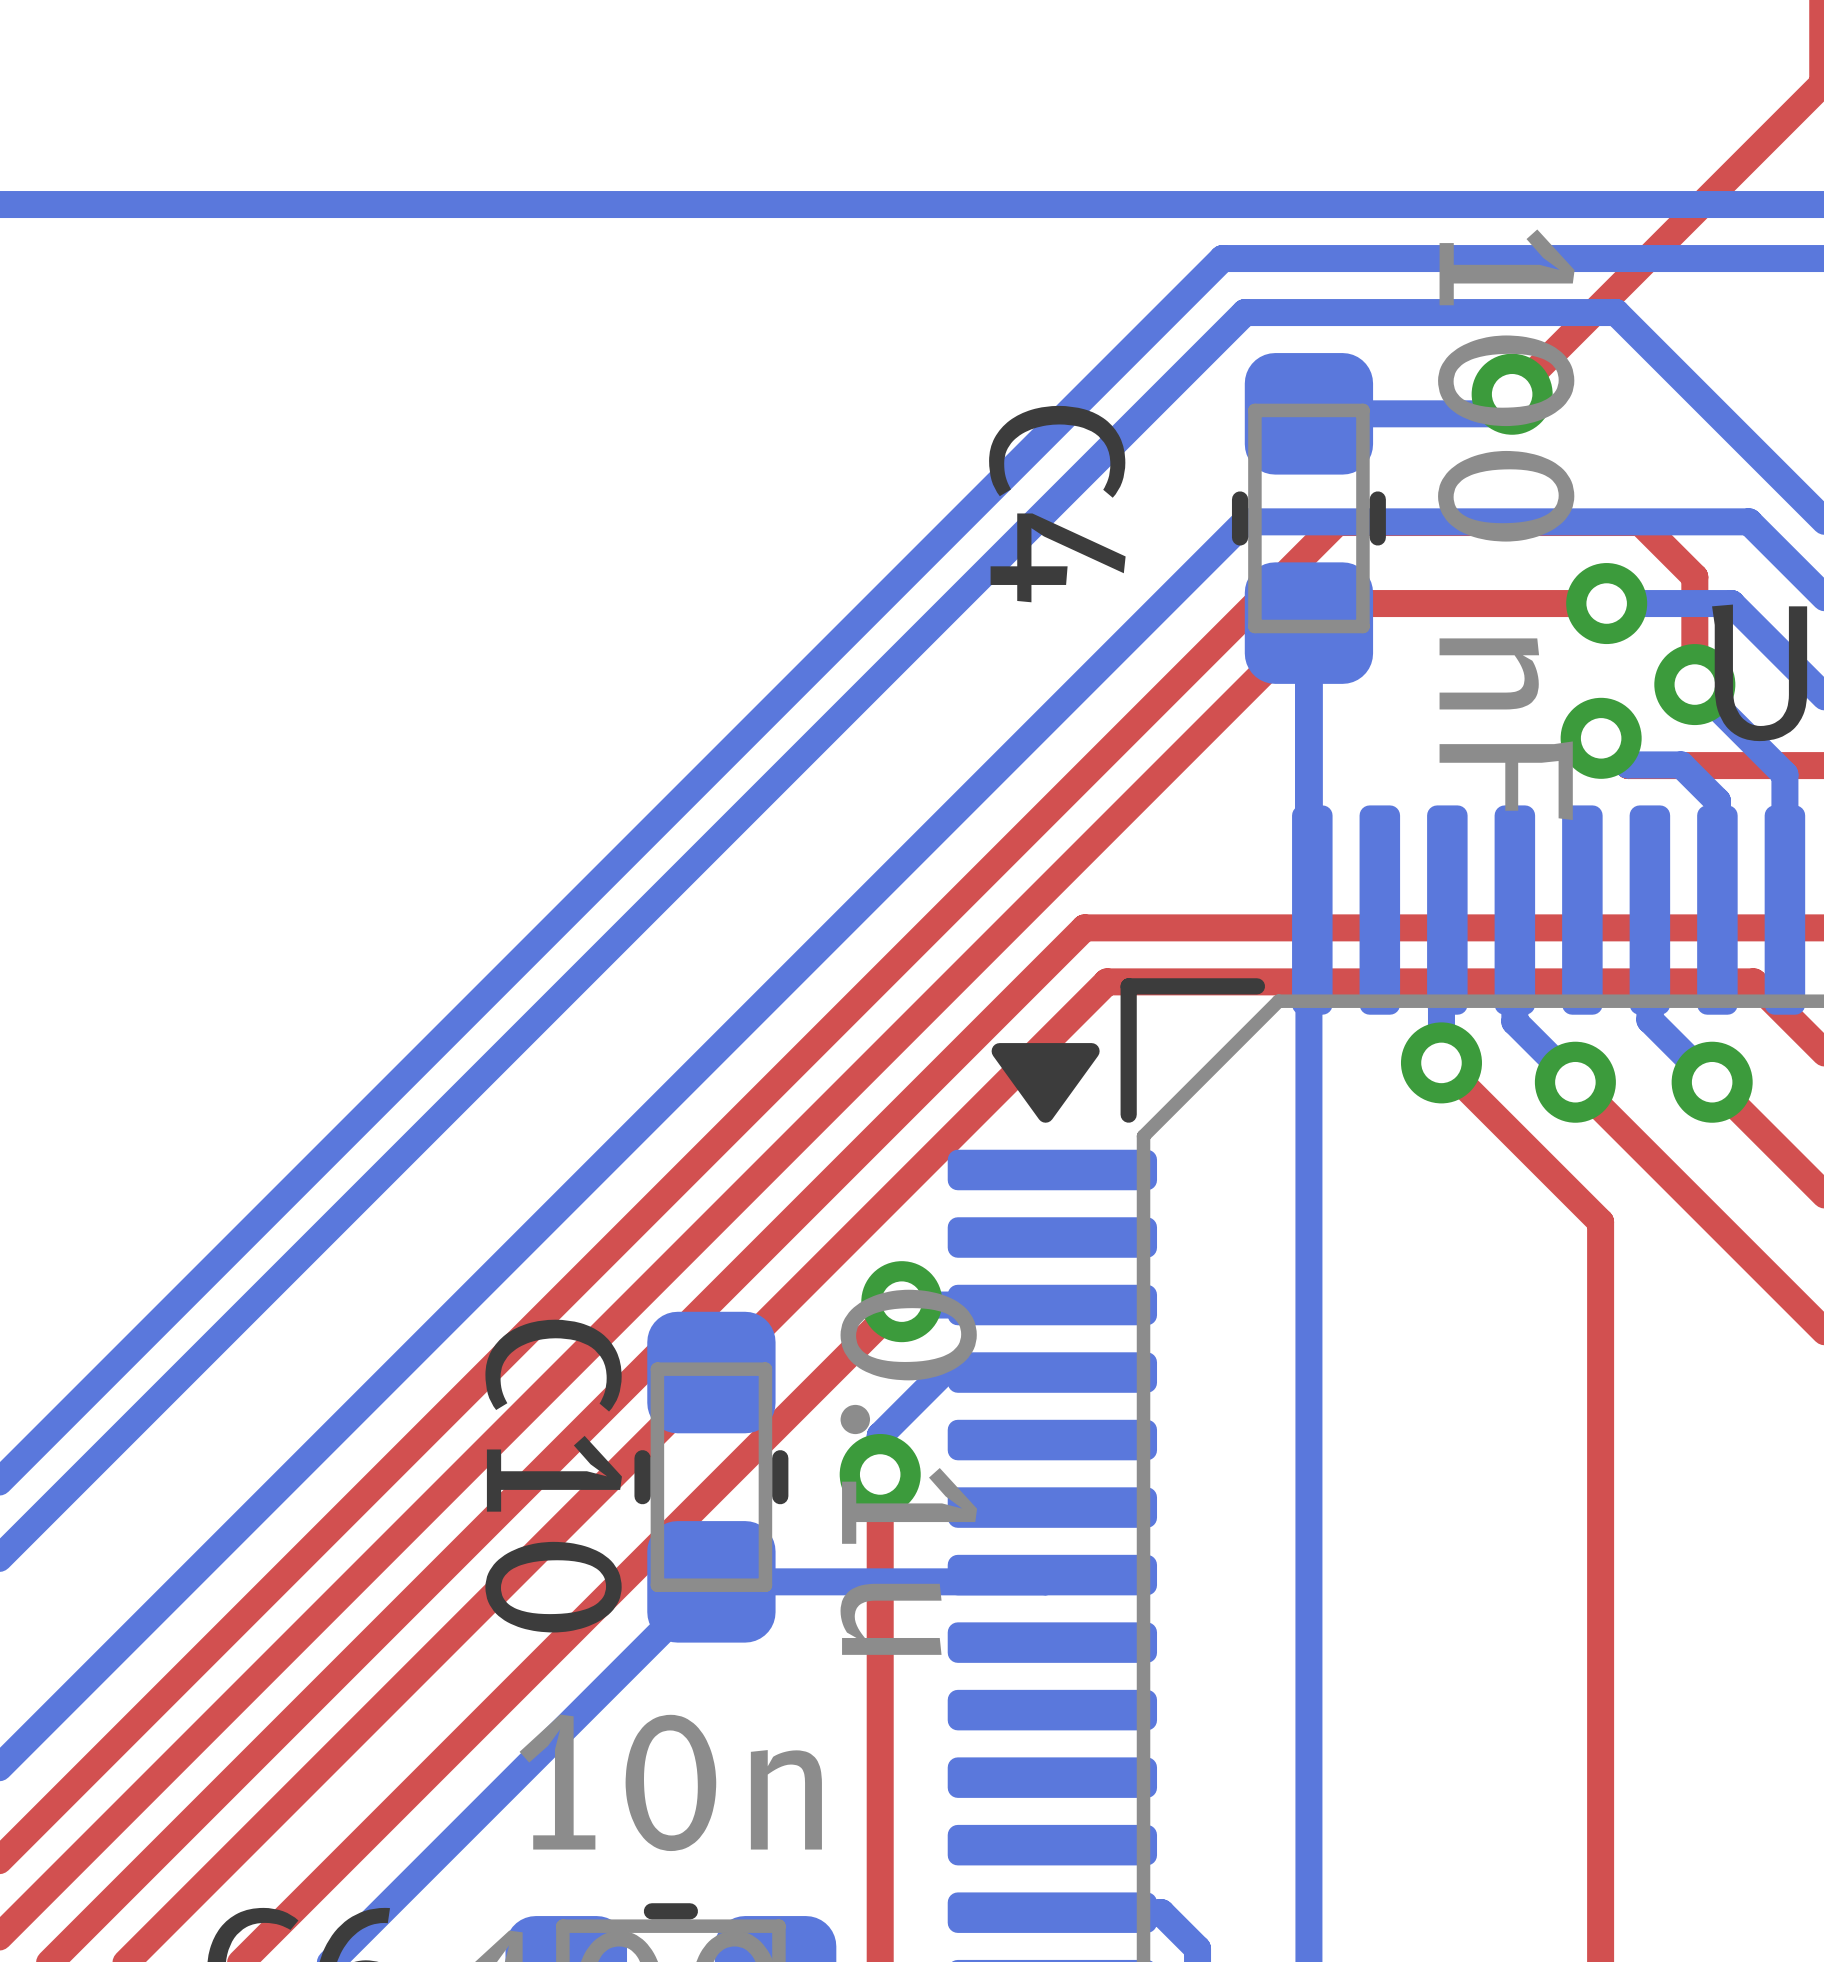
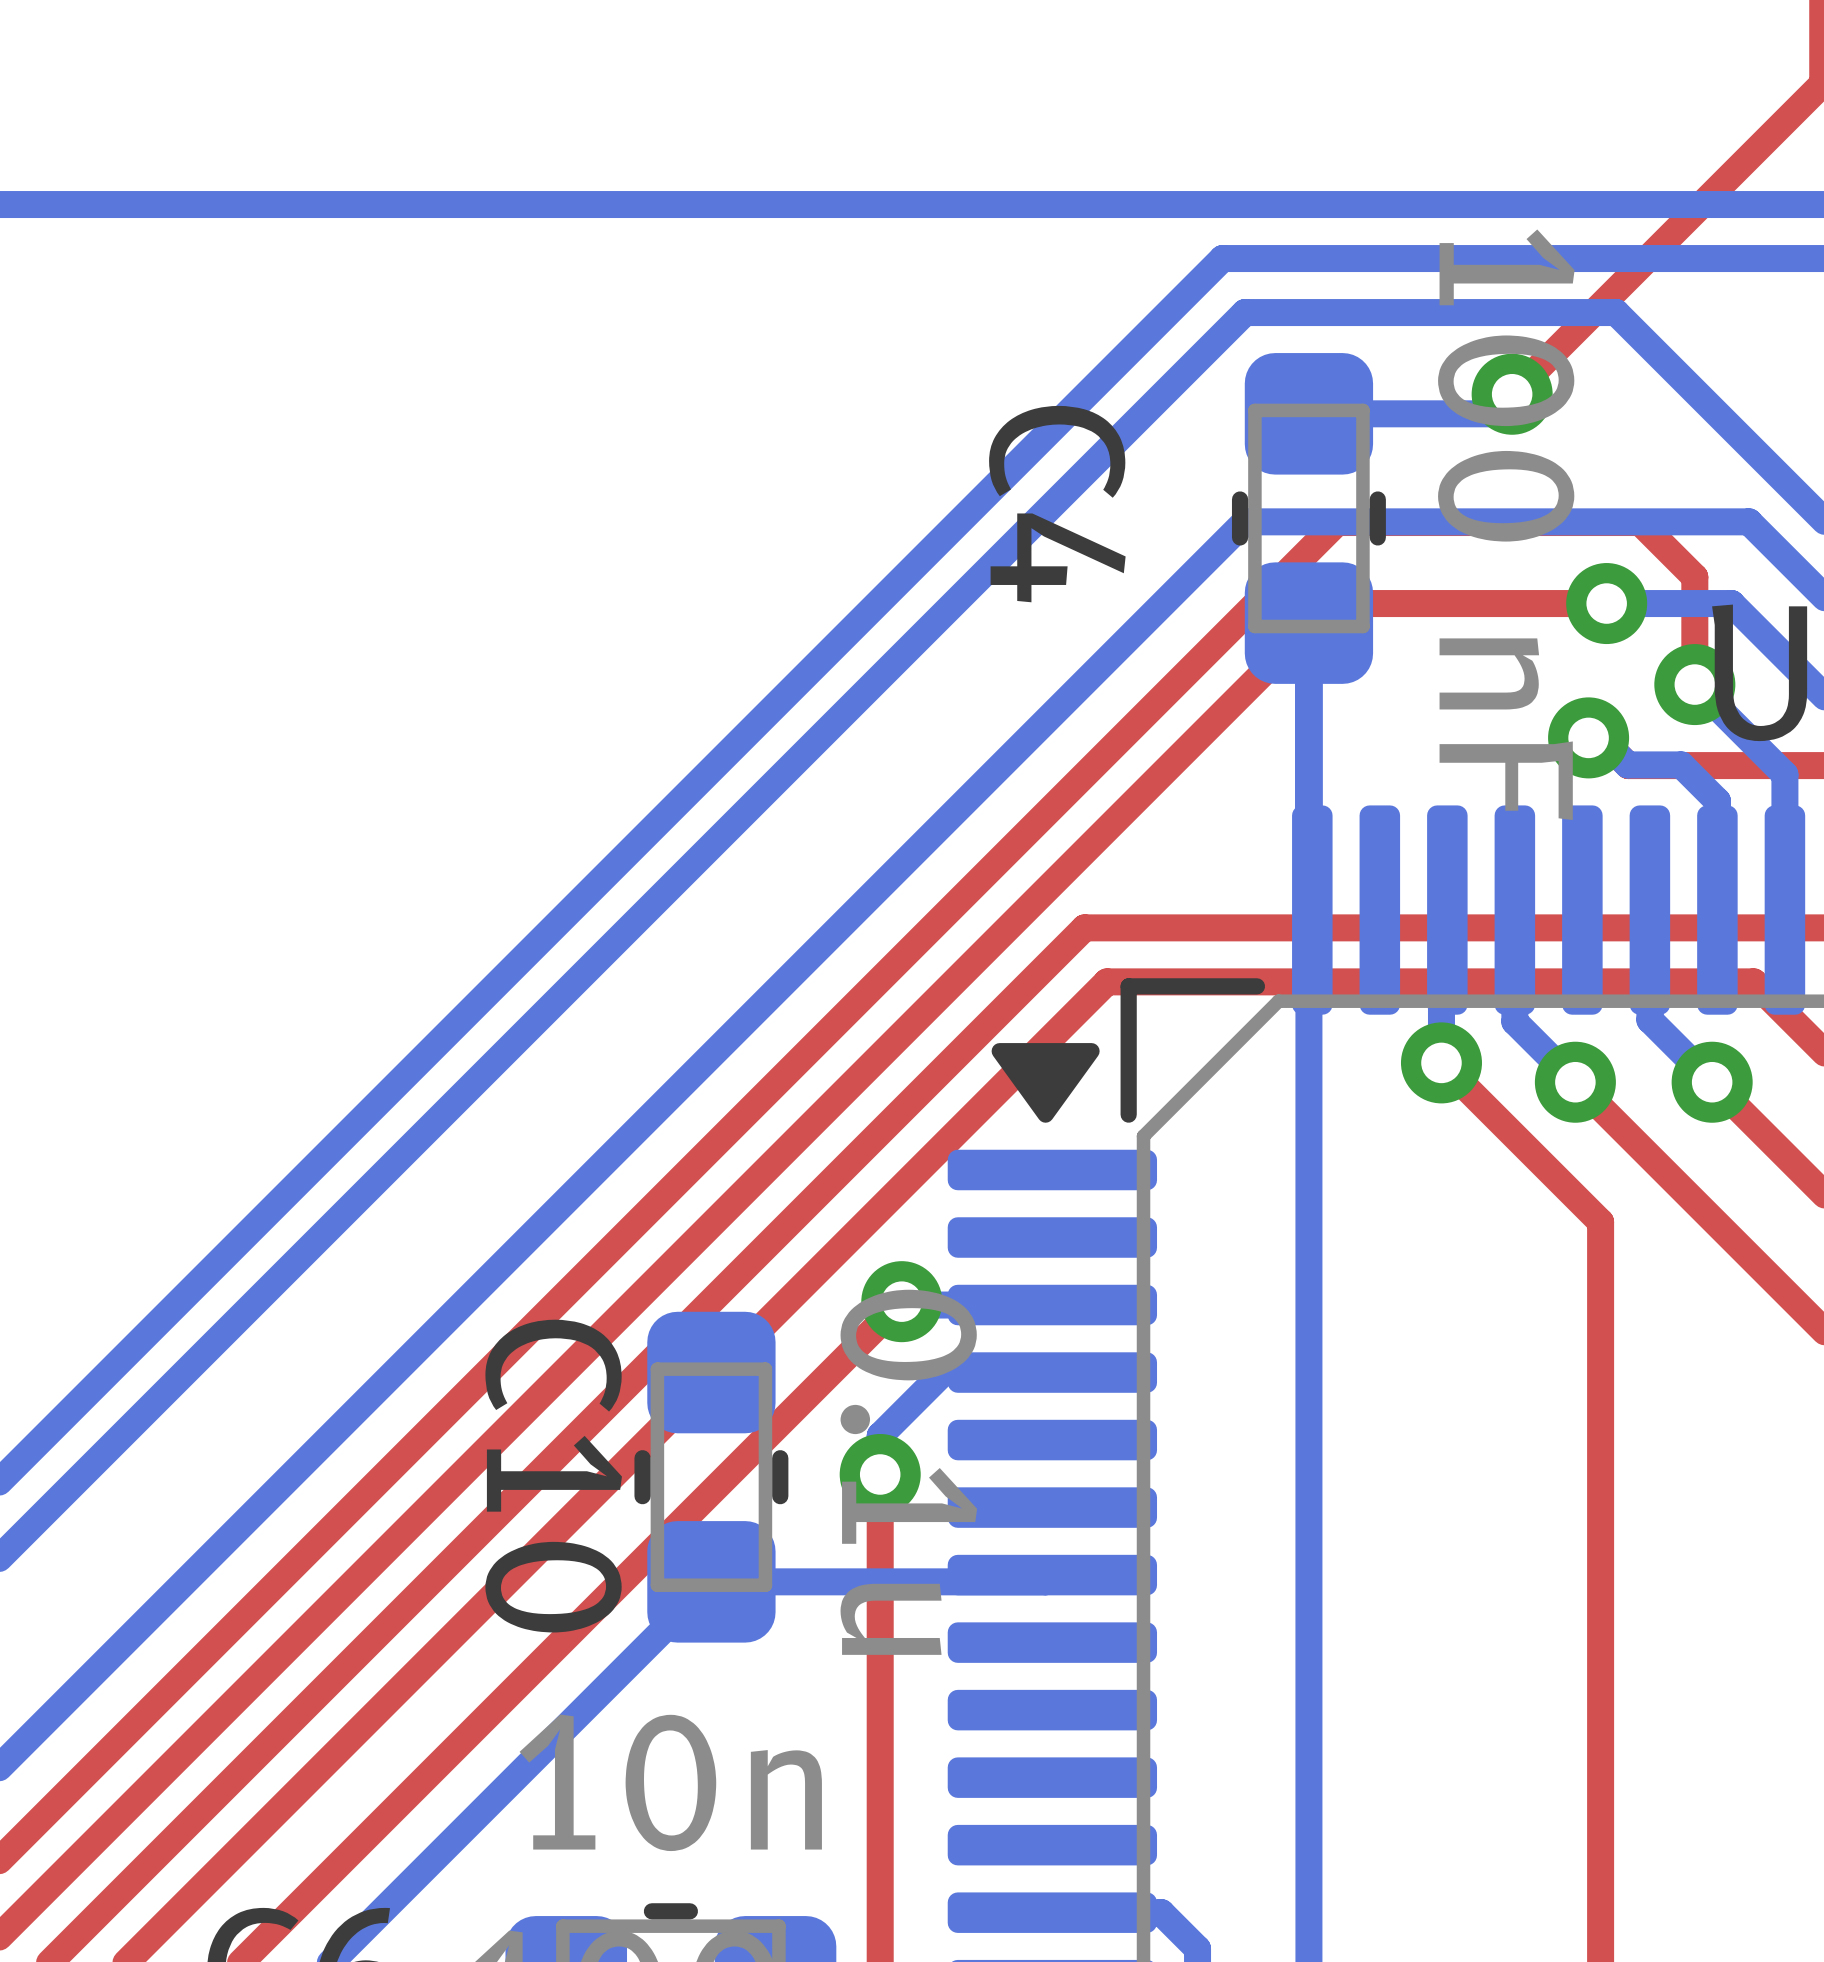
via position: (1601, 738) -> (1588, 737)

